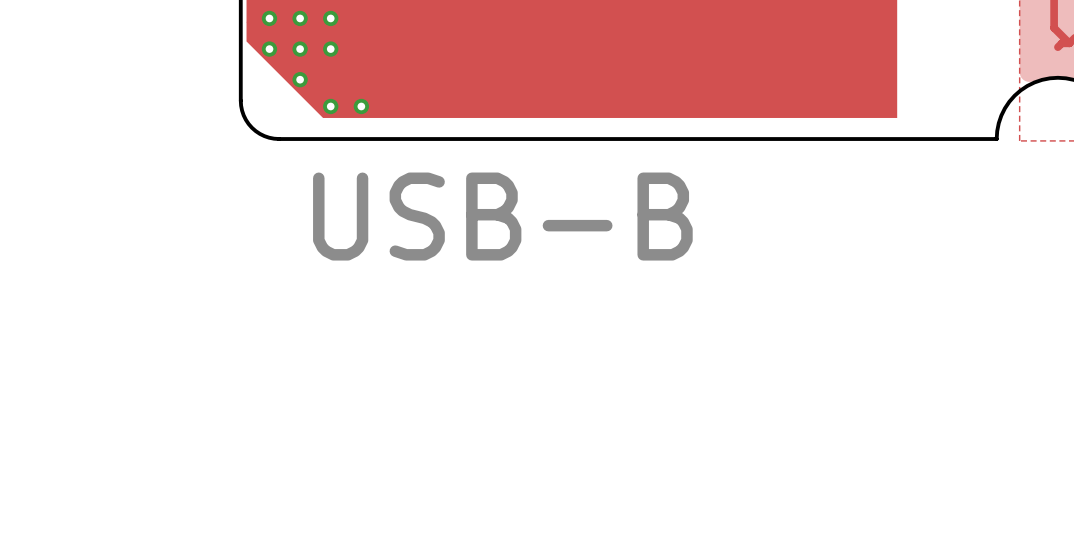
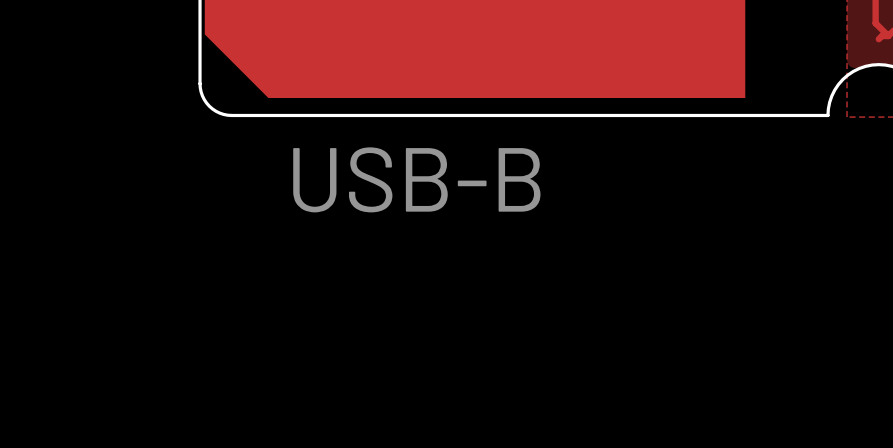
via: (269, 18) -> none
via: (300, 18) -> none
via: (330, 18) -> none
via: (269, 49) -> none
via: (300, 49) -> none
via: (330, 49) -> none
via: (300, 79) -> none
via: (330, 106) -> none
via: (361, 106) -> none

